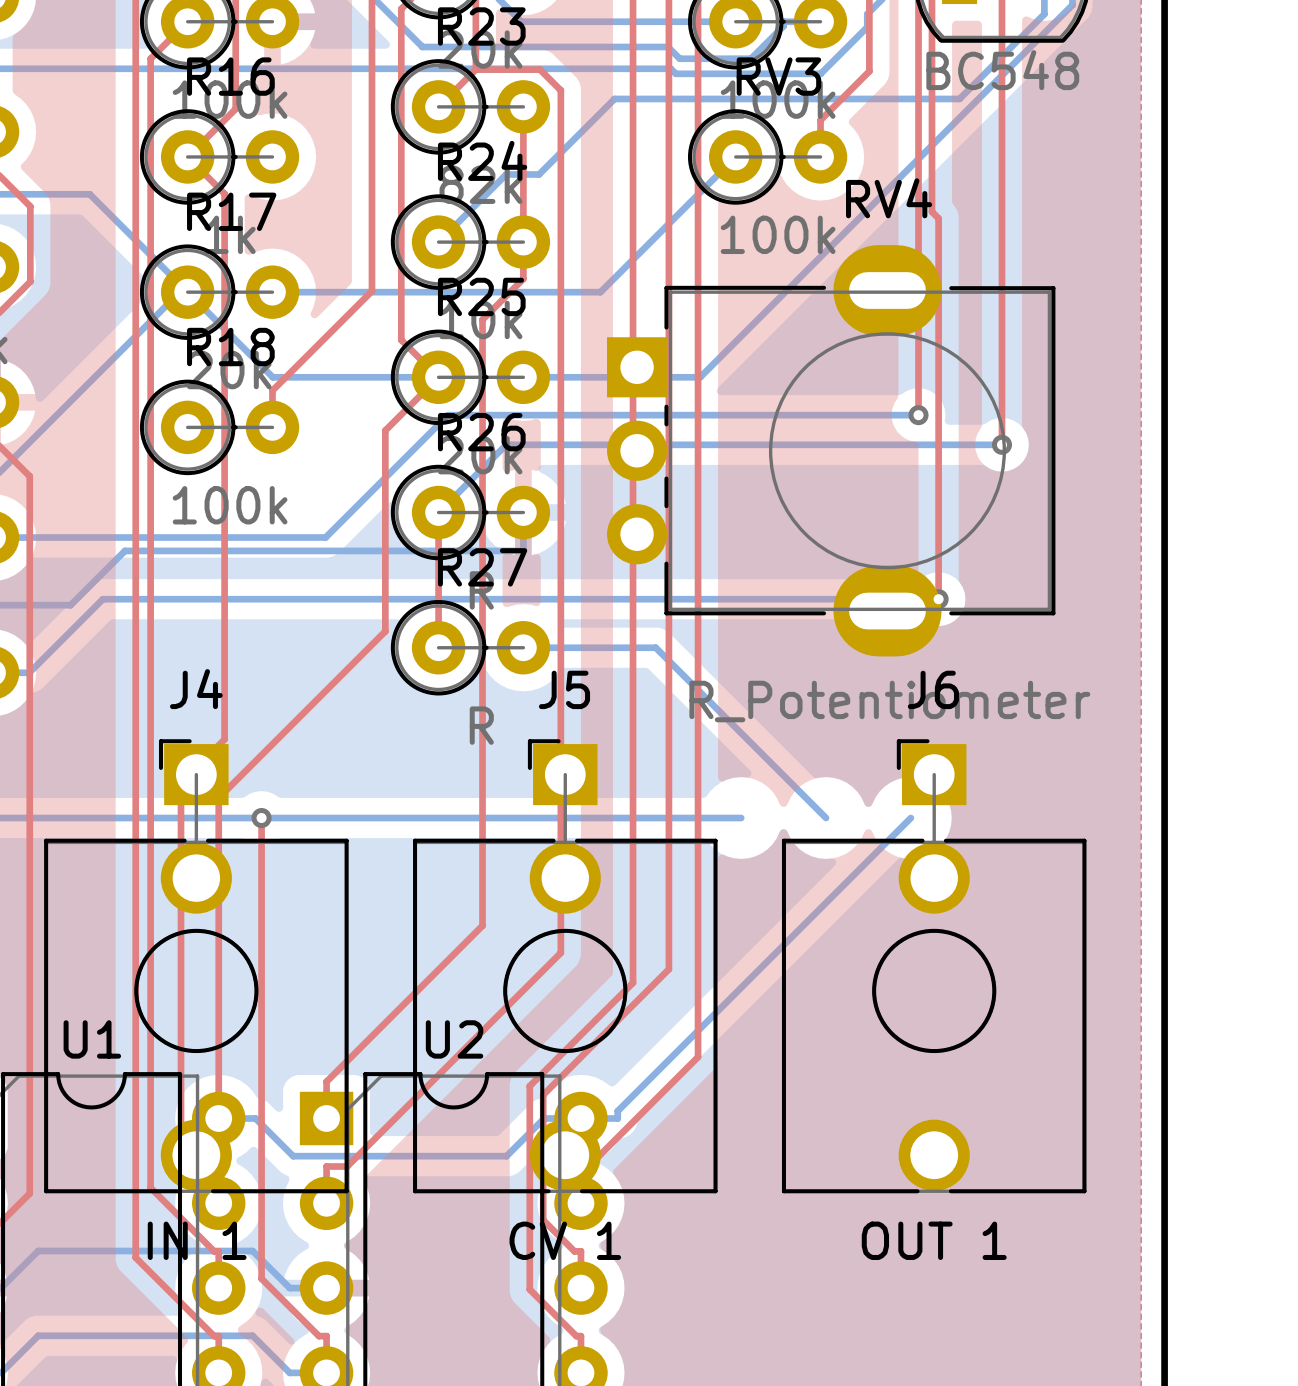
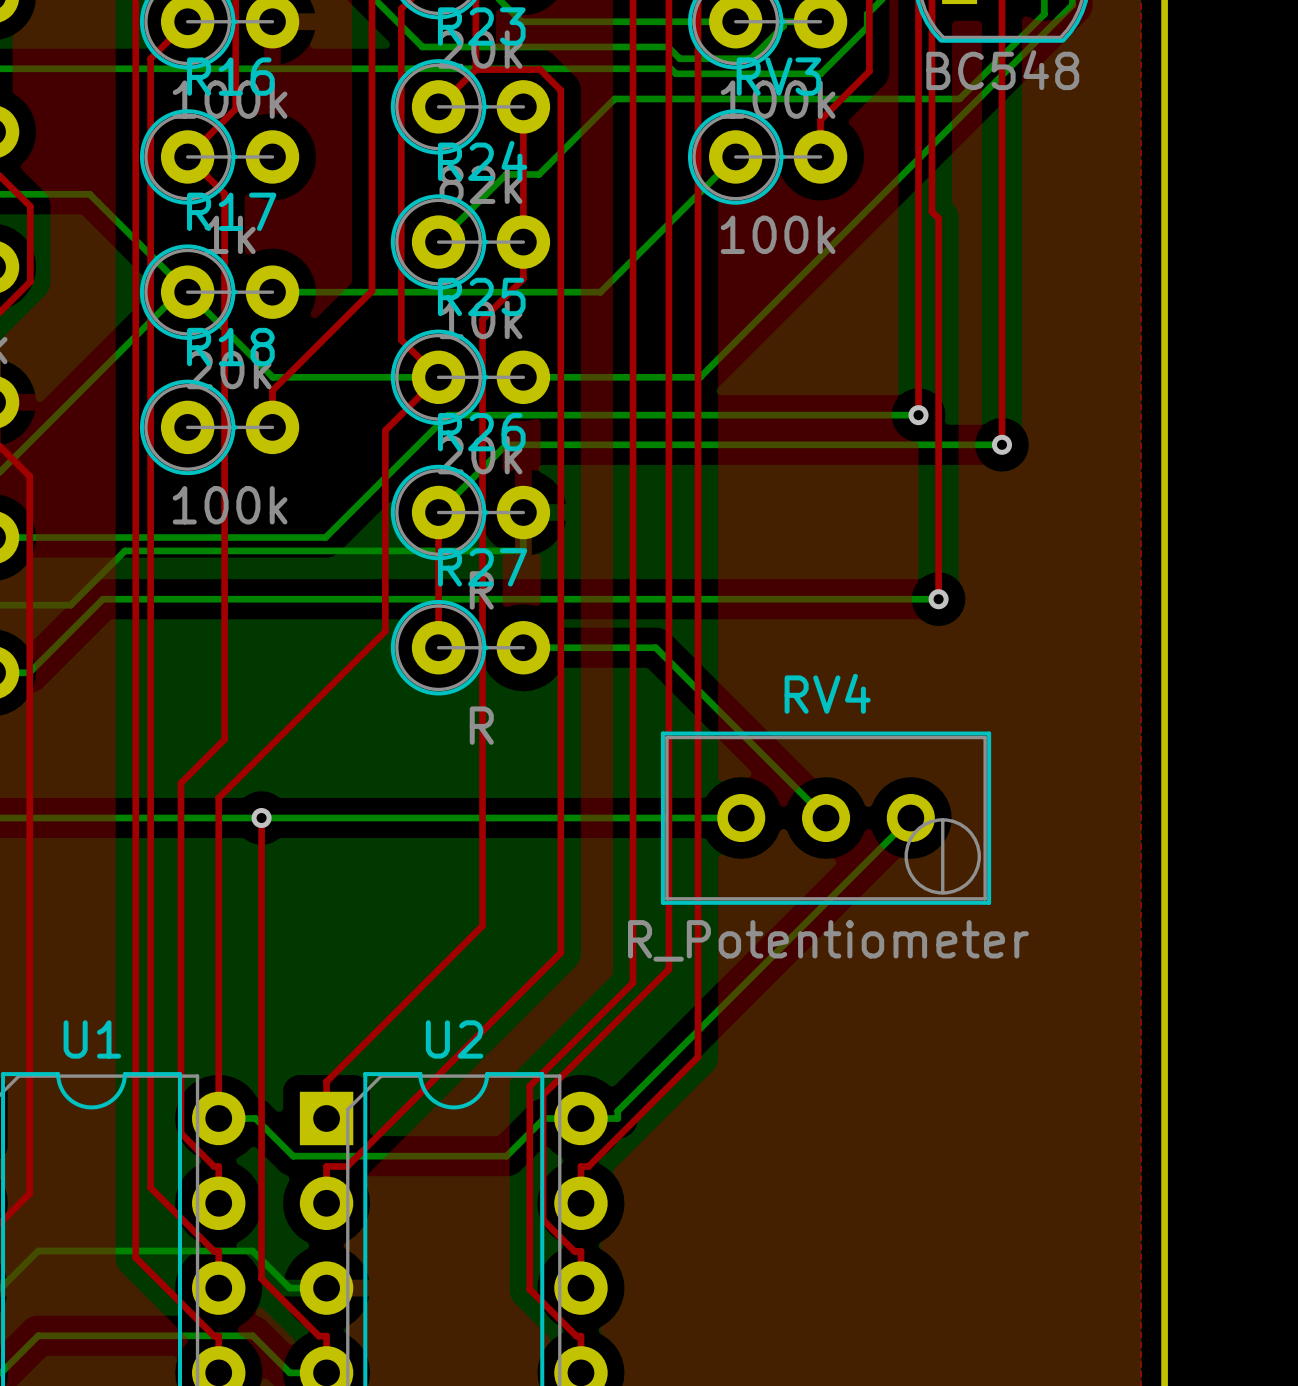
RV4 name position: RV4 (889, 198) -> RV4 (827, 693)
RV4 footprint: [607, 245, 1056, 657] -> [660, 731, 992, 905]
RV4 value position: R_Potentiometer (889, 701) -> R_Potentiometer (828, 940)
J4: IN 1 (196, 966) -> none
J5: CV 1 (565, 966) -> none
J6: OUT 1 (934, 966) -> none

